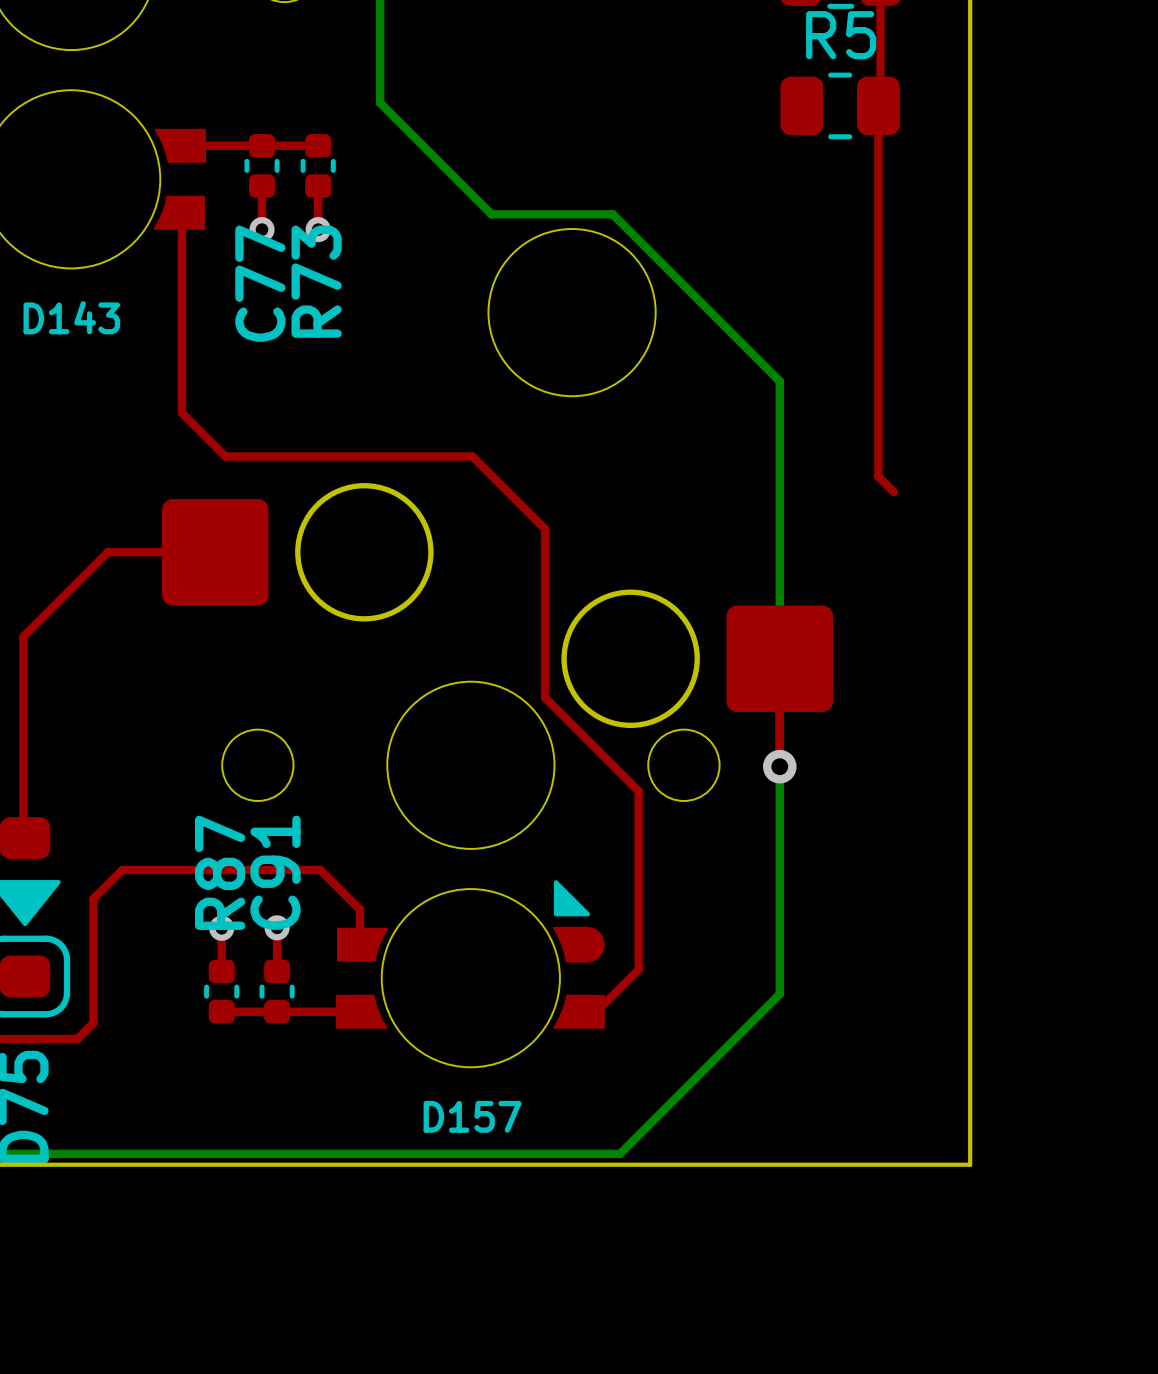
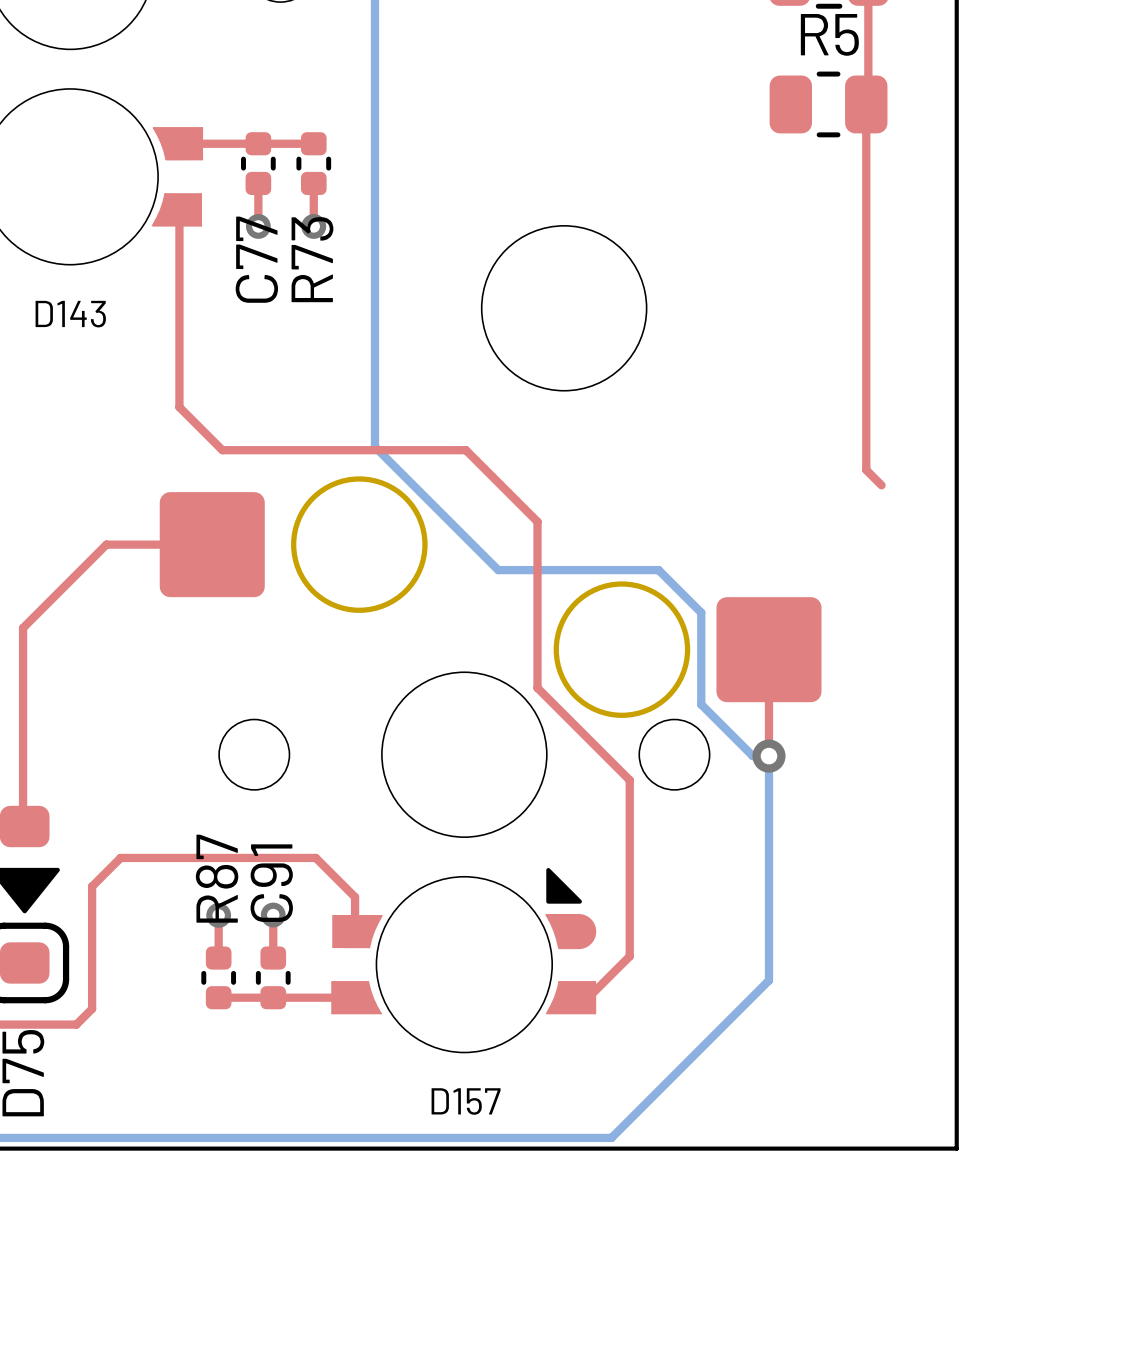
bottom track: (380, 102) (491, 214) (612, 214) (779, 381) (779, 766) -> (374, 101) (374, 446) (498, 570) (658, 570) (701, 612) (701, 704) (752, 756) (768, 756)

